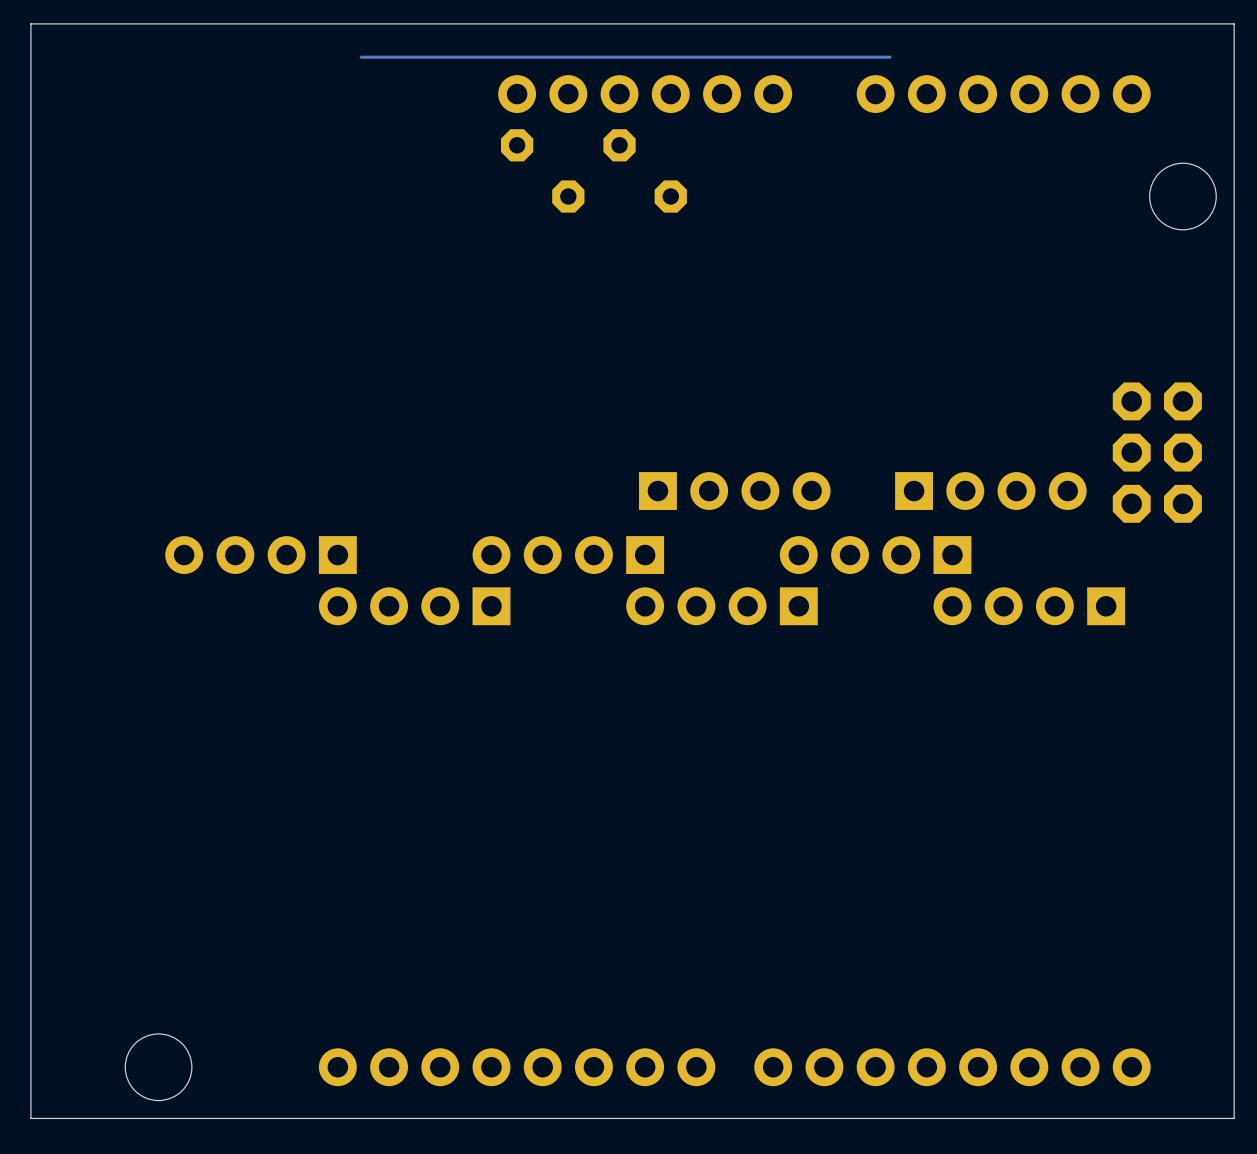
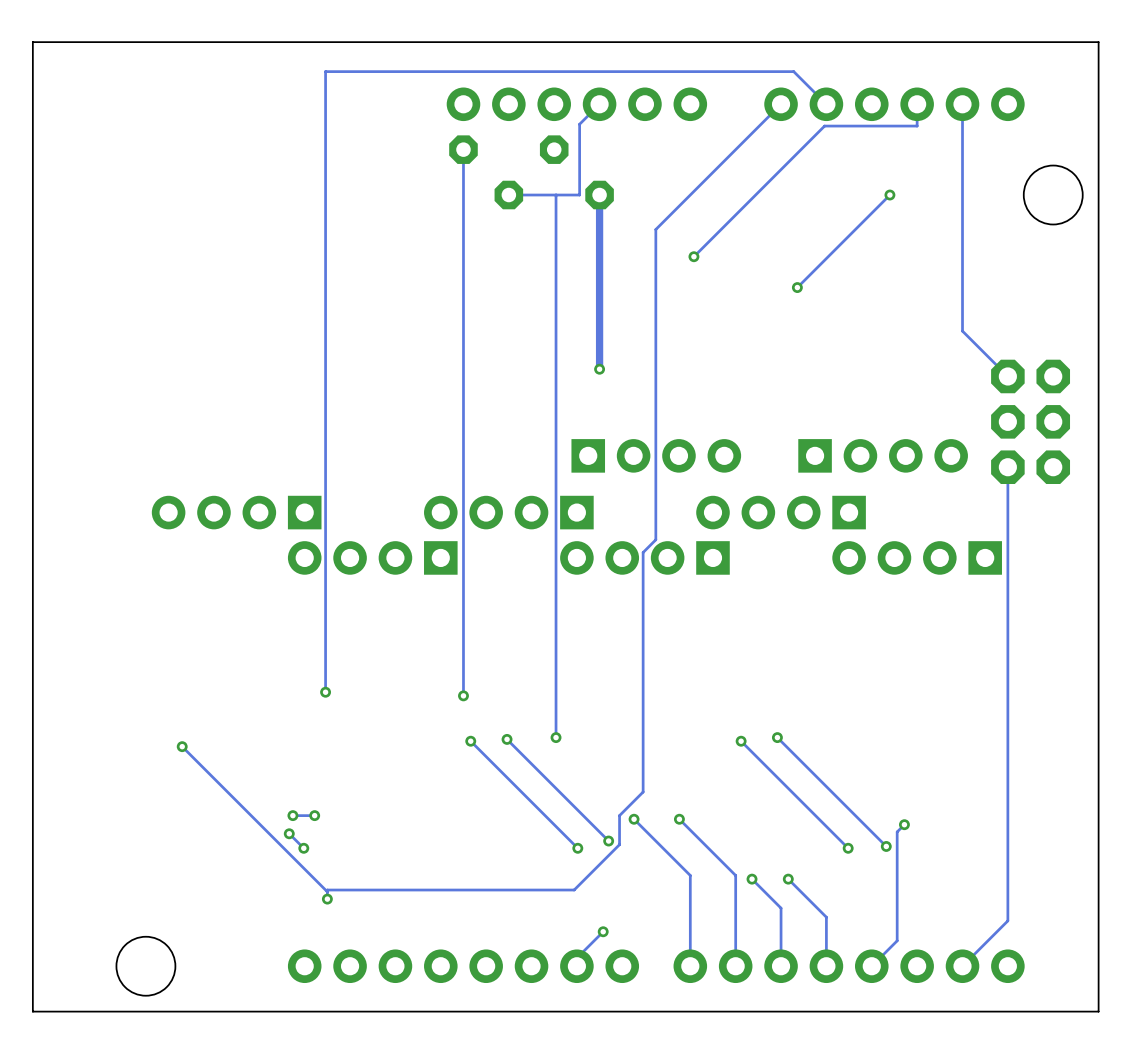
track: none -> (325, 71) (325, 692)
track: none -> (793, 71) (826, 104)
track: none -> (599, 104) (579, 124) (579, 195) (508, 195)
track: none -> (781, 104) (655, 229) (655, 539) (643, 552) (643, 792) (619, 815) (619, 844) (574, 890) (326, 890)
track: none -> (917, 104) (917, 126) (824, 126) (693, 256)
track: none -> (962, 104) (962, 331) (1007, 376)
track: none -> (463, 149) (463, 695)
track: none -> (556, 195) (556, 737)
track: none -> (599, 195) (599, 369)
track: none -> (889, 195) (797, 287)
via: none -> (889, 195)
via: none -> (693, 256)
via: none -> (797, 287)
via: none -> (599, 369)
track: none -> (1007, 467) (1007, 920) (962, 966)
via: none -> (325, 692)
via: none -> (463, 695)
via: none -> (556, 737)
track: none -> (777, 737) (886, 846)
via: none -> (777, 737)
track: none -> (507, 739) (608, 841)
via: none -> (507, 739)
track: none -> (470, 741) (577, 848)
via: none -> (470, 741)
track: none -> (741, 741) (848, 848)
via: none -> (741, 741)
track: none -> (182, 746) (327, 891) (327, 899)
via: none -> (182, 746)
via: none -> (292, 815)
track: none -> (314, 815) (292, 815)
via: none -> (314, 815)
track: none -> (634, 819) (690, 875) (690, 966)
via: none -> (634, 819)
track: none -> (679, 819) (735, 875) (735, 966)
via: none -> (679, 819)
track: none -> (904, 824) (897, 831) (897, 940) (871, 966)
via: none -> (904, 824)
track: none -> (289, 833) (303, 848)
via: none -> (289, 833)
via: none -> (608, 841)
via: none -> (886, 846)
via: none -> (303, 848)
via: none -> (577, 848)
via: none -> (848, 848)
track: none -> (752, 879) (781, 908) (781, 966)
via: none -> (752, 879)
track: none -> (788, 879) (826, 917) (826, 966)
via: none -> (788, 879)
via: none -> (327, 899)
track: none -> (603, 931) (577, 957) (576, 966)
via: none -> (603, 931)

